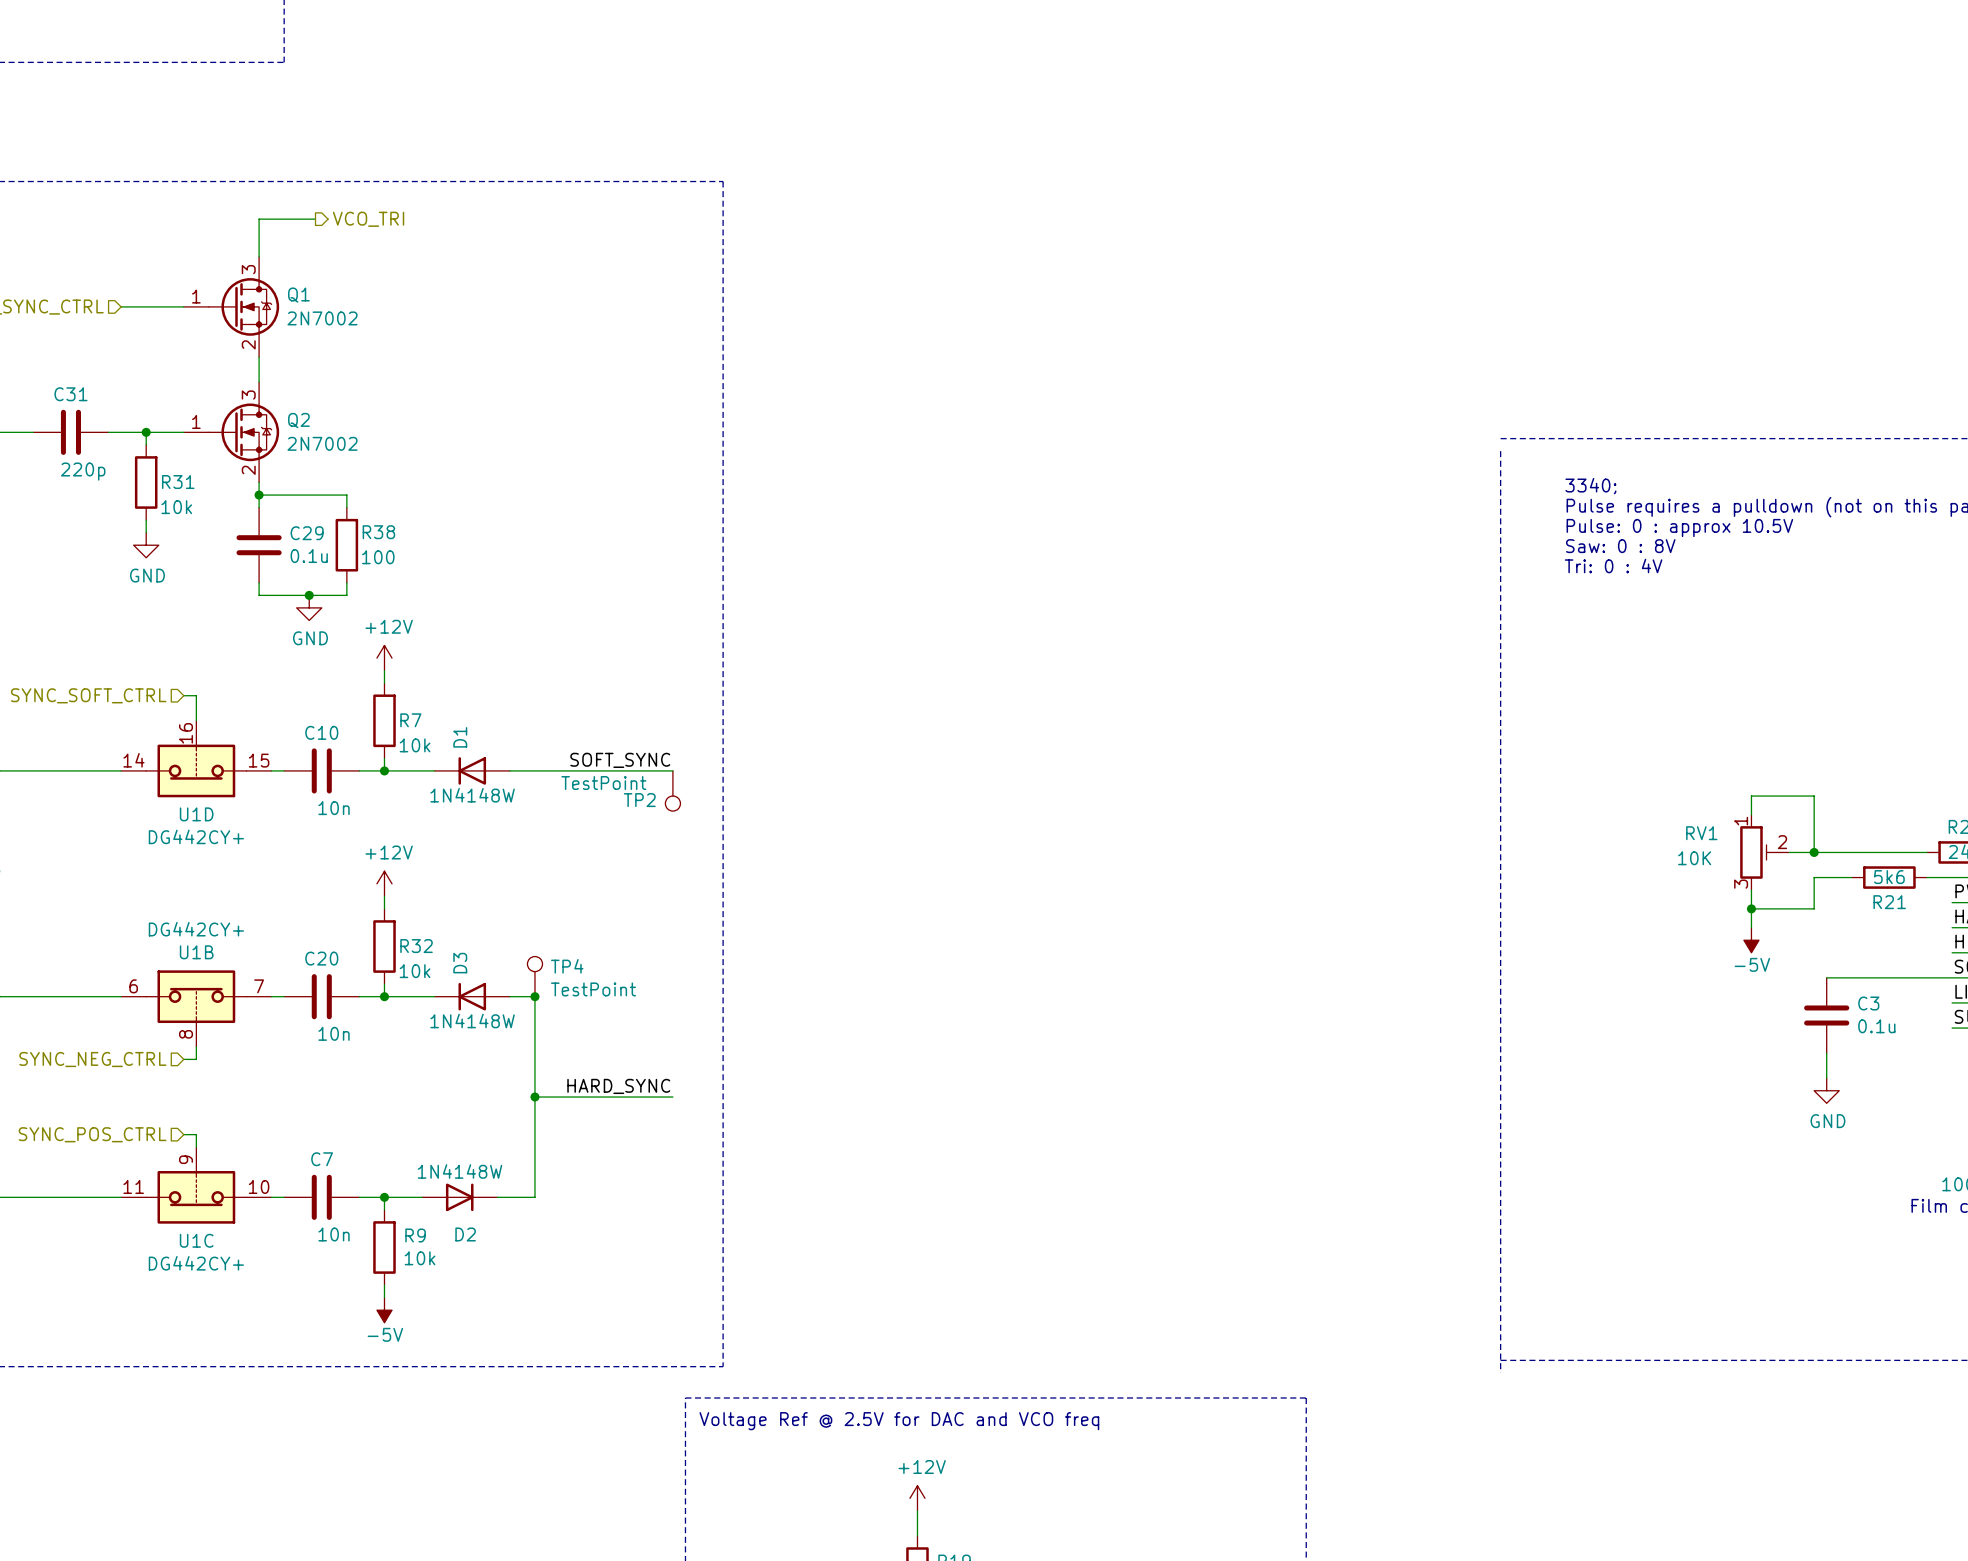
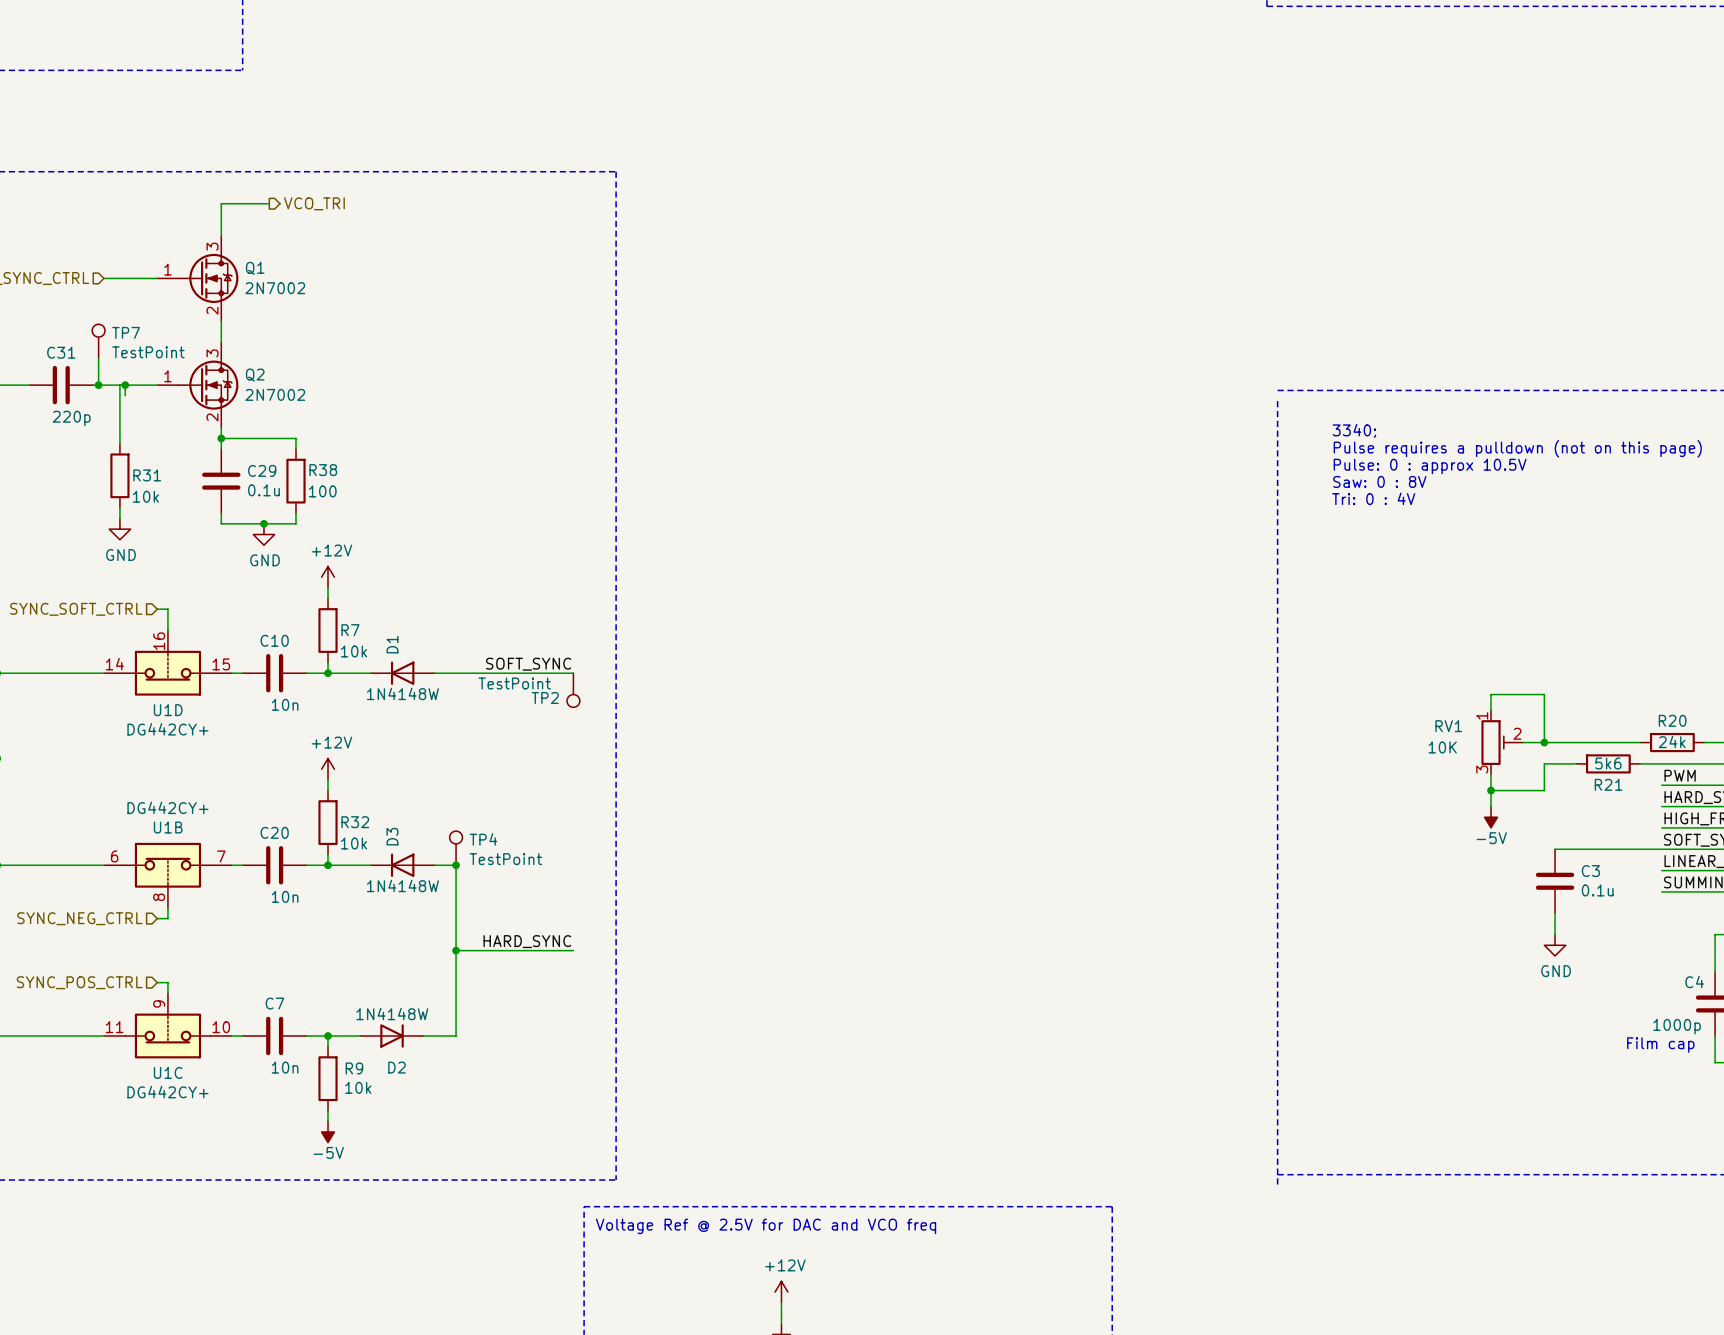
TP7: none -> TestPoint (98, 341)
wire: none -> (98, 358) (98, 385)
junction: none -> (98, 385)
wire: none -> (119, 385) (119, 443)
R31 position: (146, 482) -> (119, 475)
wire: (146, 520) (146, 532) -> (119, 507) (119, 518)
power symbol position: GND (146, 545) -> GND (119, 529)

